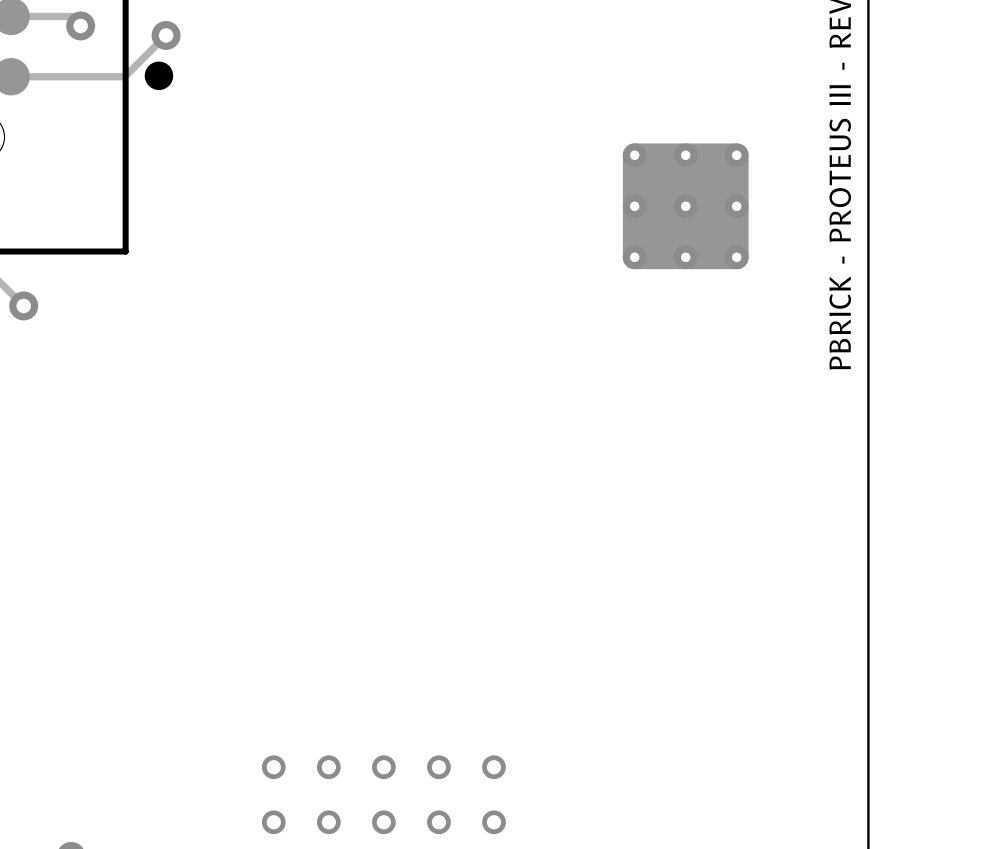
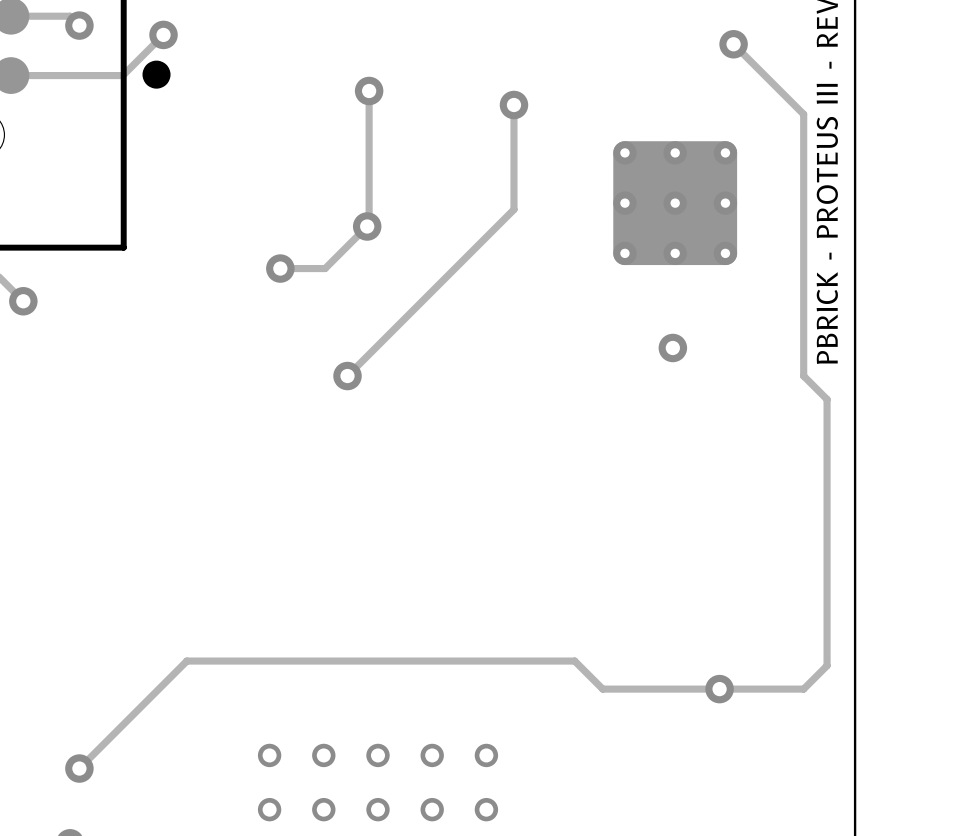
track: none -> (733, 44) (803, 114) (803, 376) (827, 399) (827, 665) (803, 689) (602, 689) (574, 661) (186, 661) (79, 768)
via: none -> (733, 44)
track: none -> (369, 90) (369, 224) (325, 268) (280, 268)
via: none -> (369, 90)
track: none -> (513, 105) (513, 209) (347, 376)
via: none -> (513, 105)
via: none -> (367, 226)
via: none -> (280, 268)
via: none -> (672, 347)
via: none -> (347, 376)
via: none -> (719, 689)
via: none -> (79, 768)

